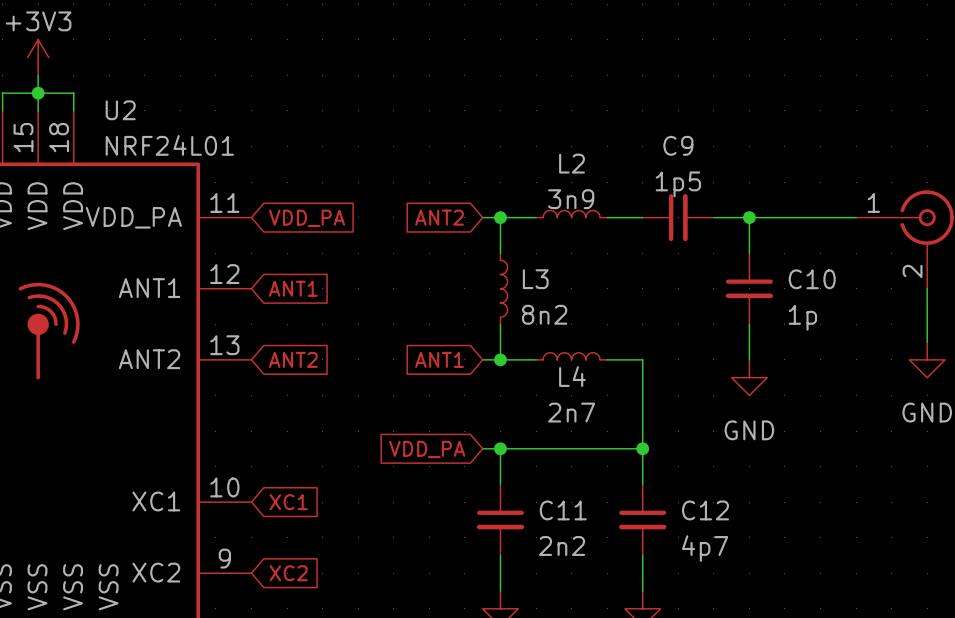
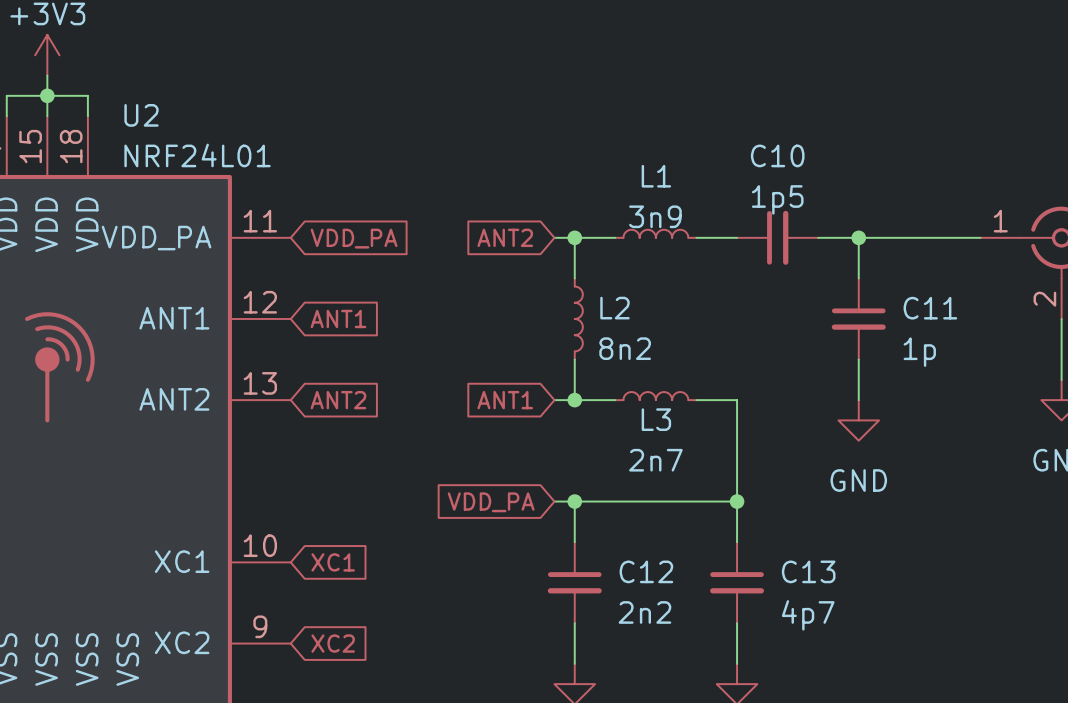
C9 name: C9 (678, 145) -> C10 (777, 155)
L2 name: L2 (572, 163) -> L1 (656, 176)
L3 name: L3 (535, 279) -> L2 (615, 308)
C10 name: C10 (812, 279) -> C11 (930, 308)
L4 name: L4 (572, 376) -> L3 (656, 419)
C11 name: C11 (563, 510) -> C12 (646, 571)
C12 name: C12 (705, 510) -> C13 (808, 571)

